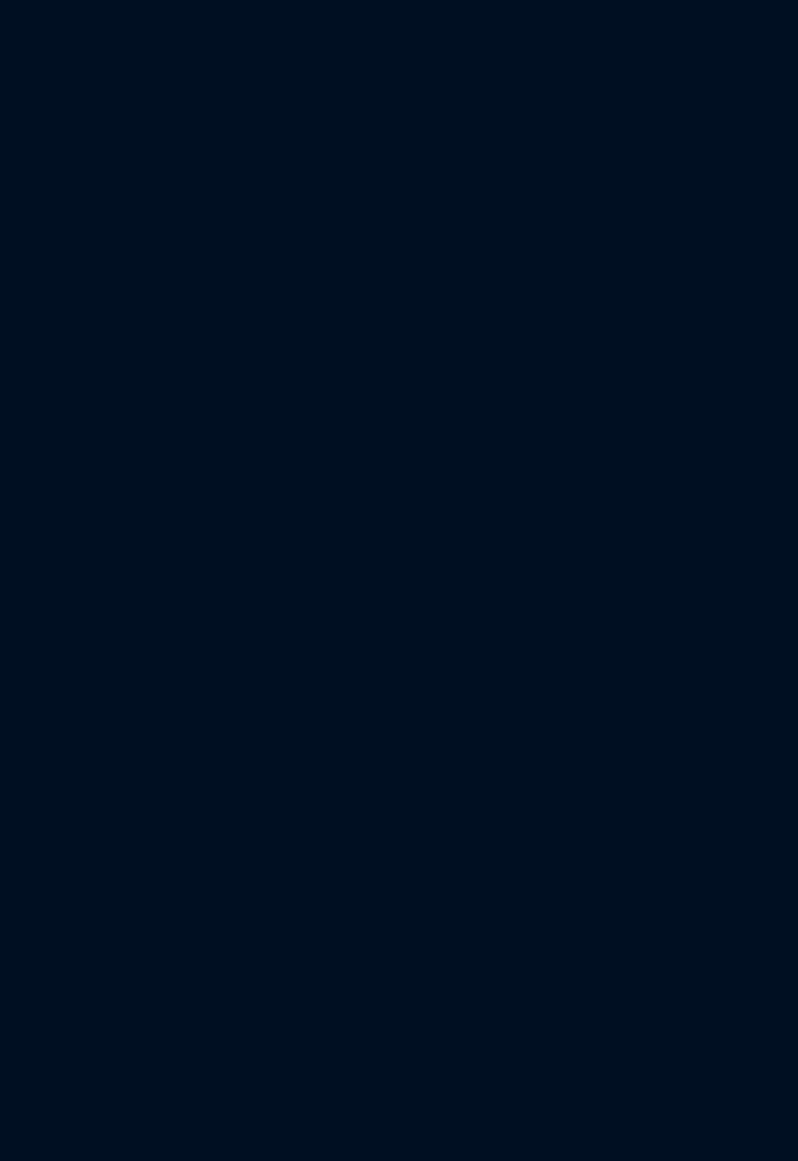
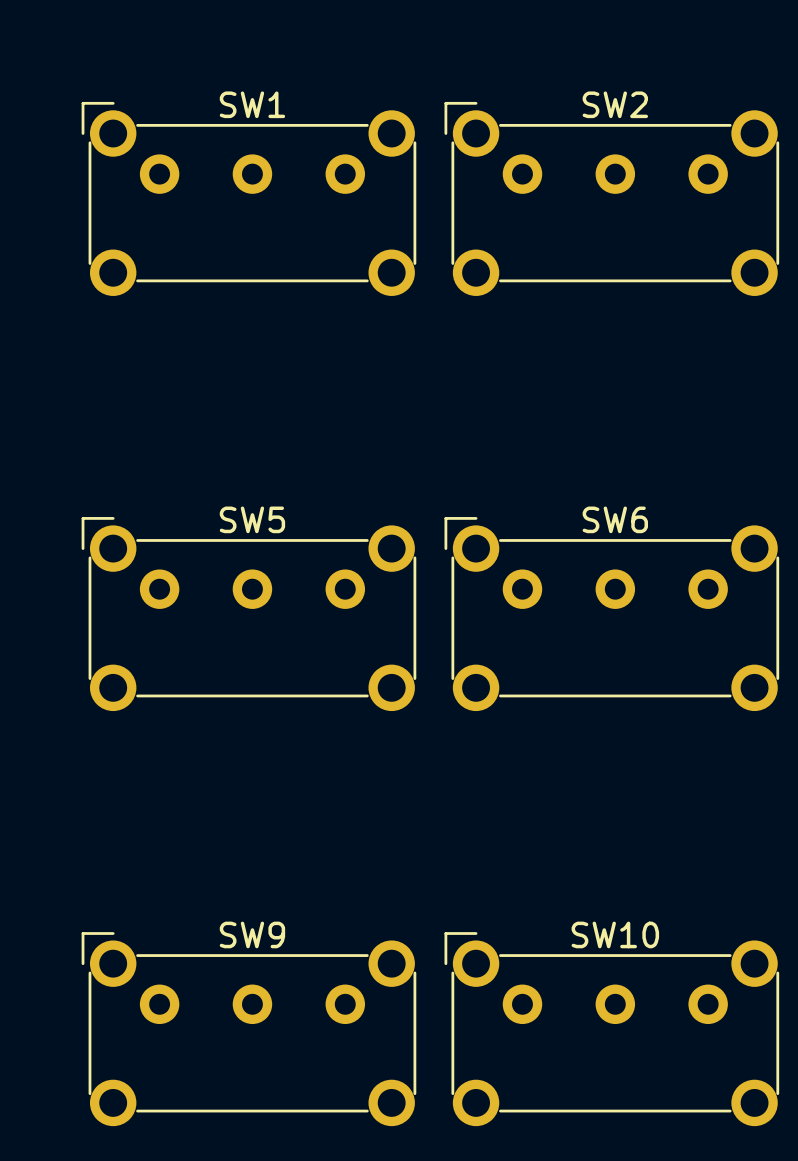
SW1: none -> (248, 198)
SW2: none -> (611, 198)
SW5: none -> (248, 614)
SW6: none -> (611, 614)
SW9: none -> (248, 1029)
SW10: none -> (611, 1029)

